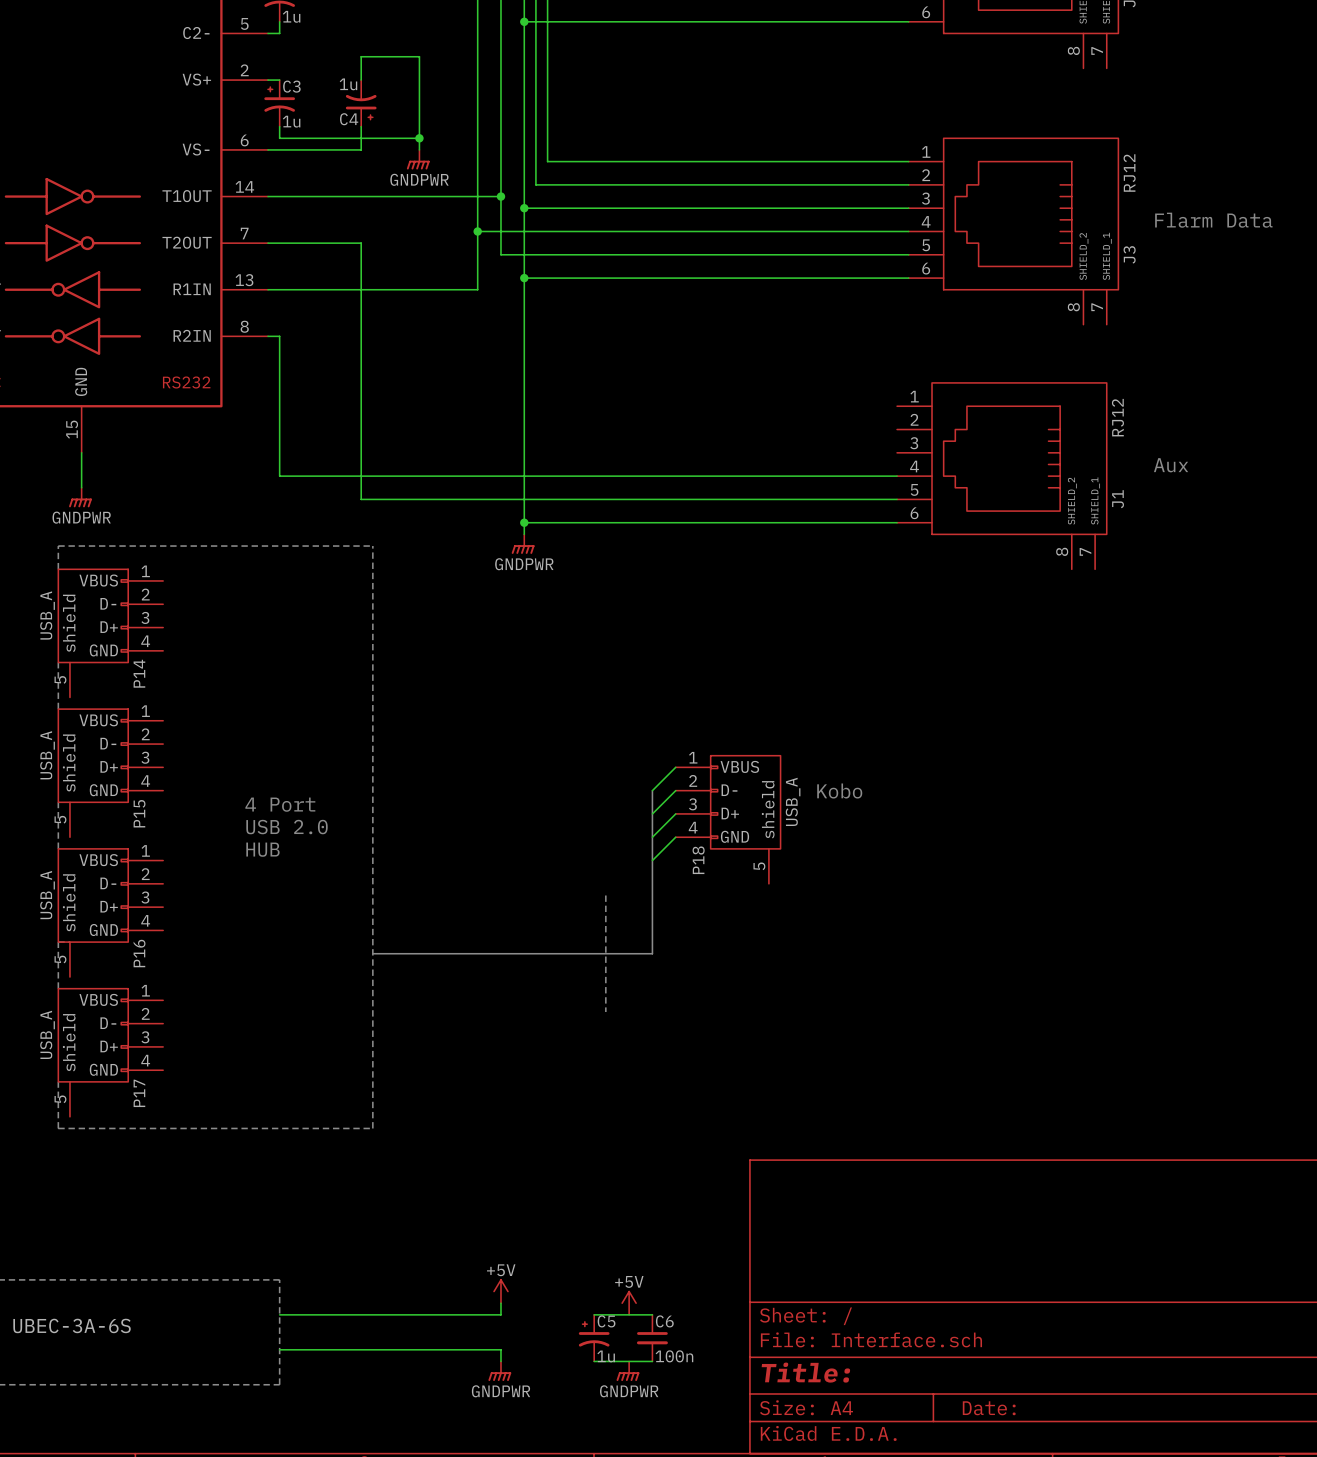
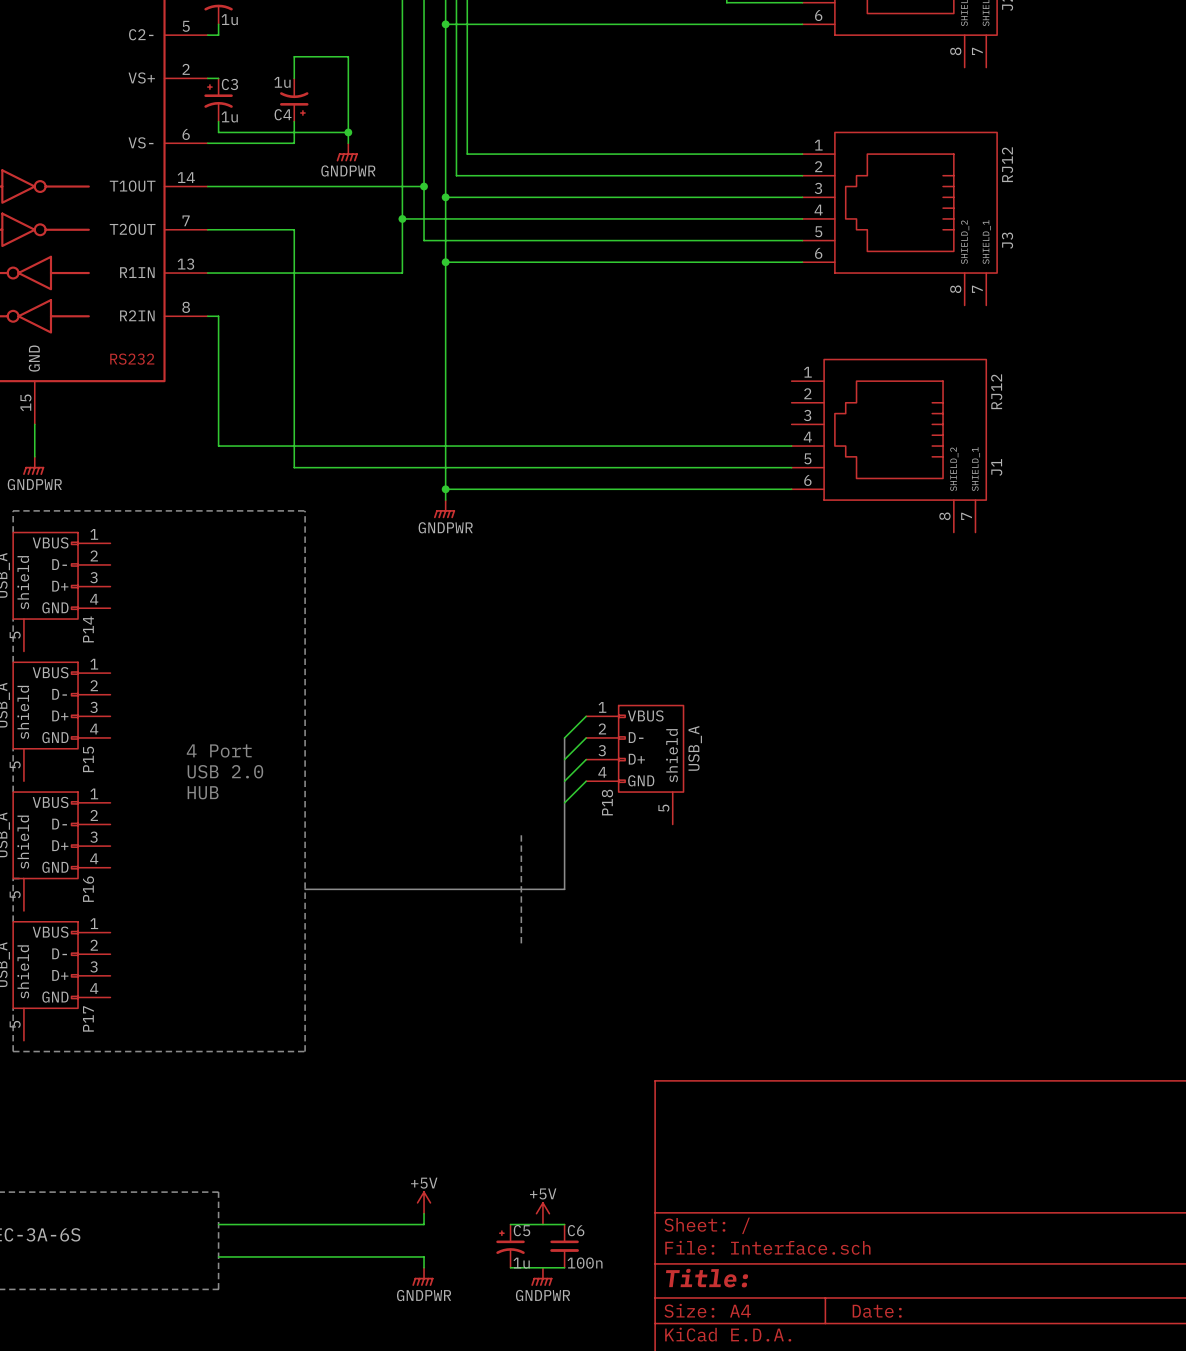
text: Flarm Data (1213, 220) -> none
text: Aux (1171, 465) -> none
text: Kobo (839, 791) -> none

